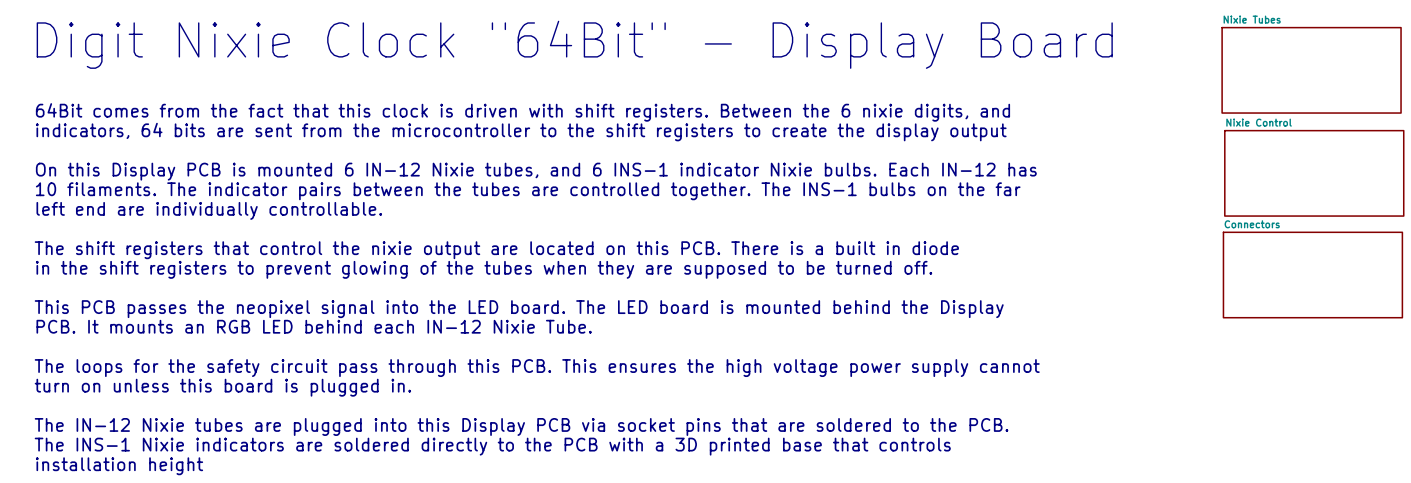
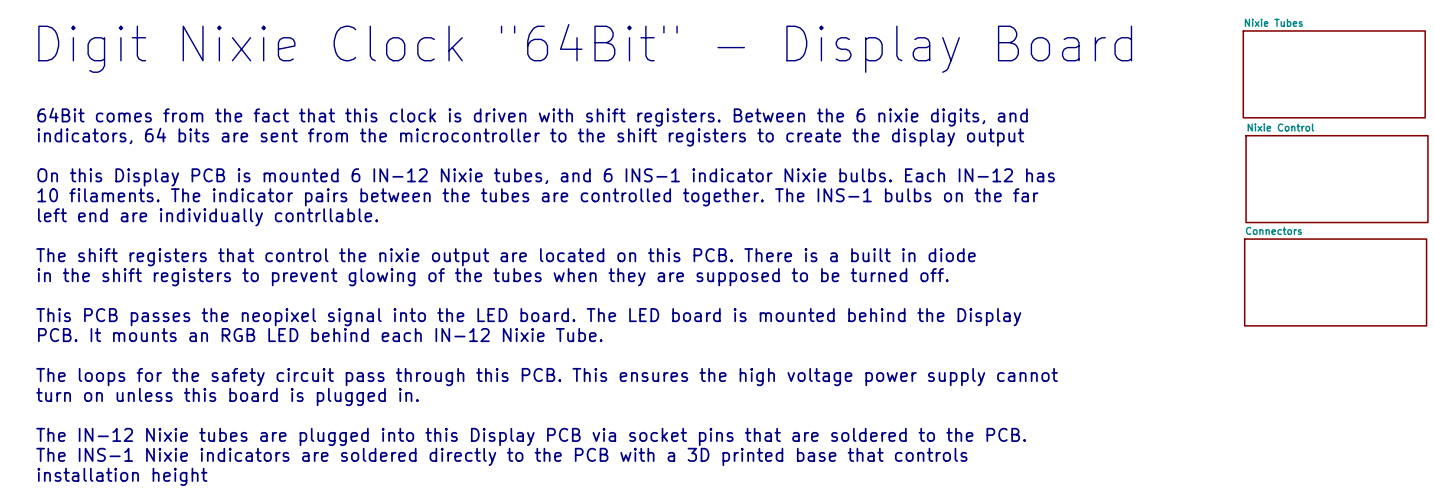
text: left end are individually controllable. (209, 210) -> left end are individually contrllable. (208, 217)

